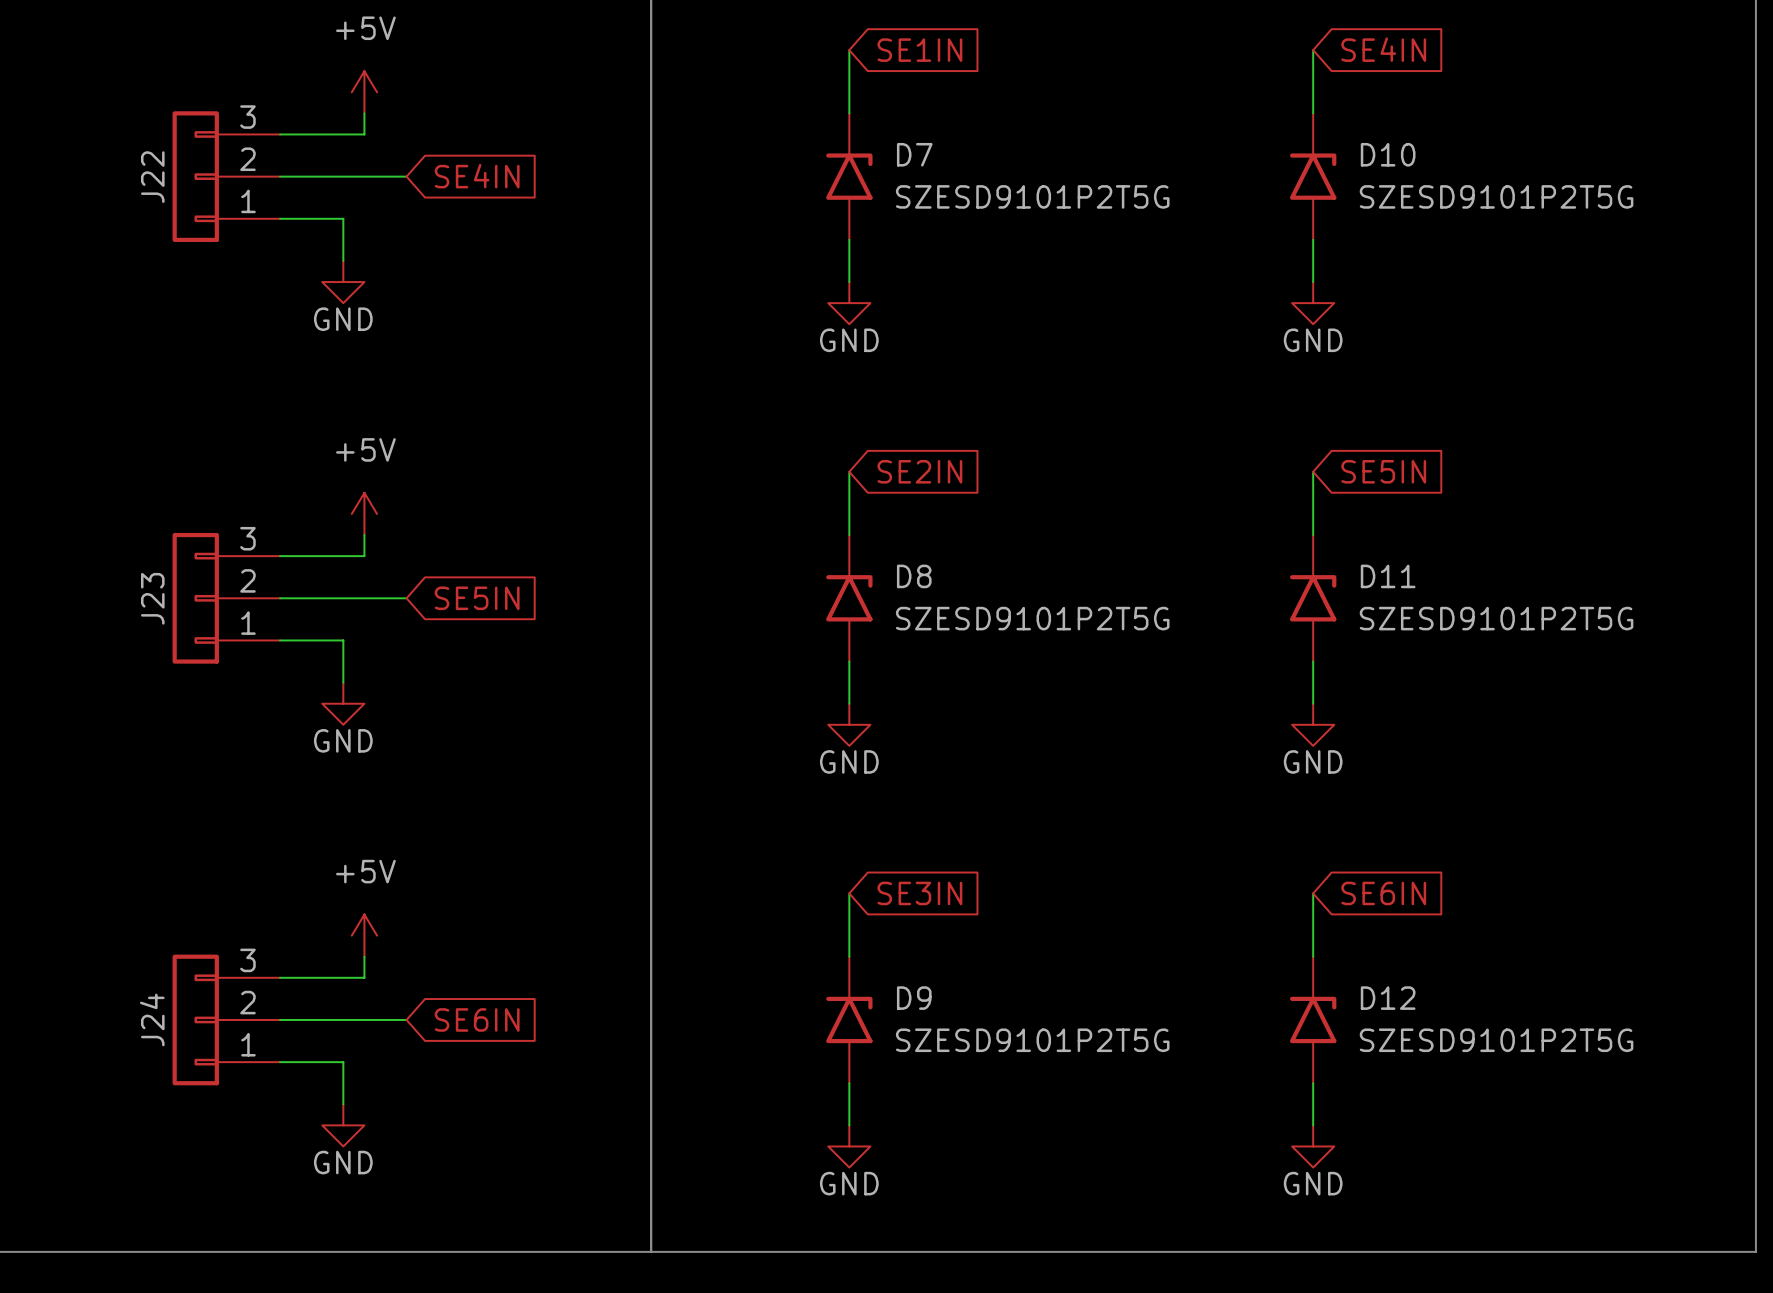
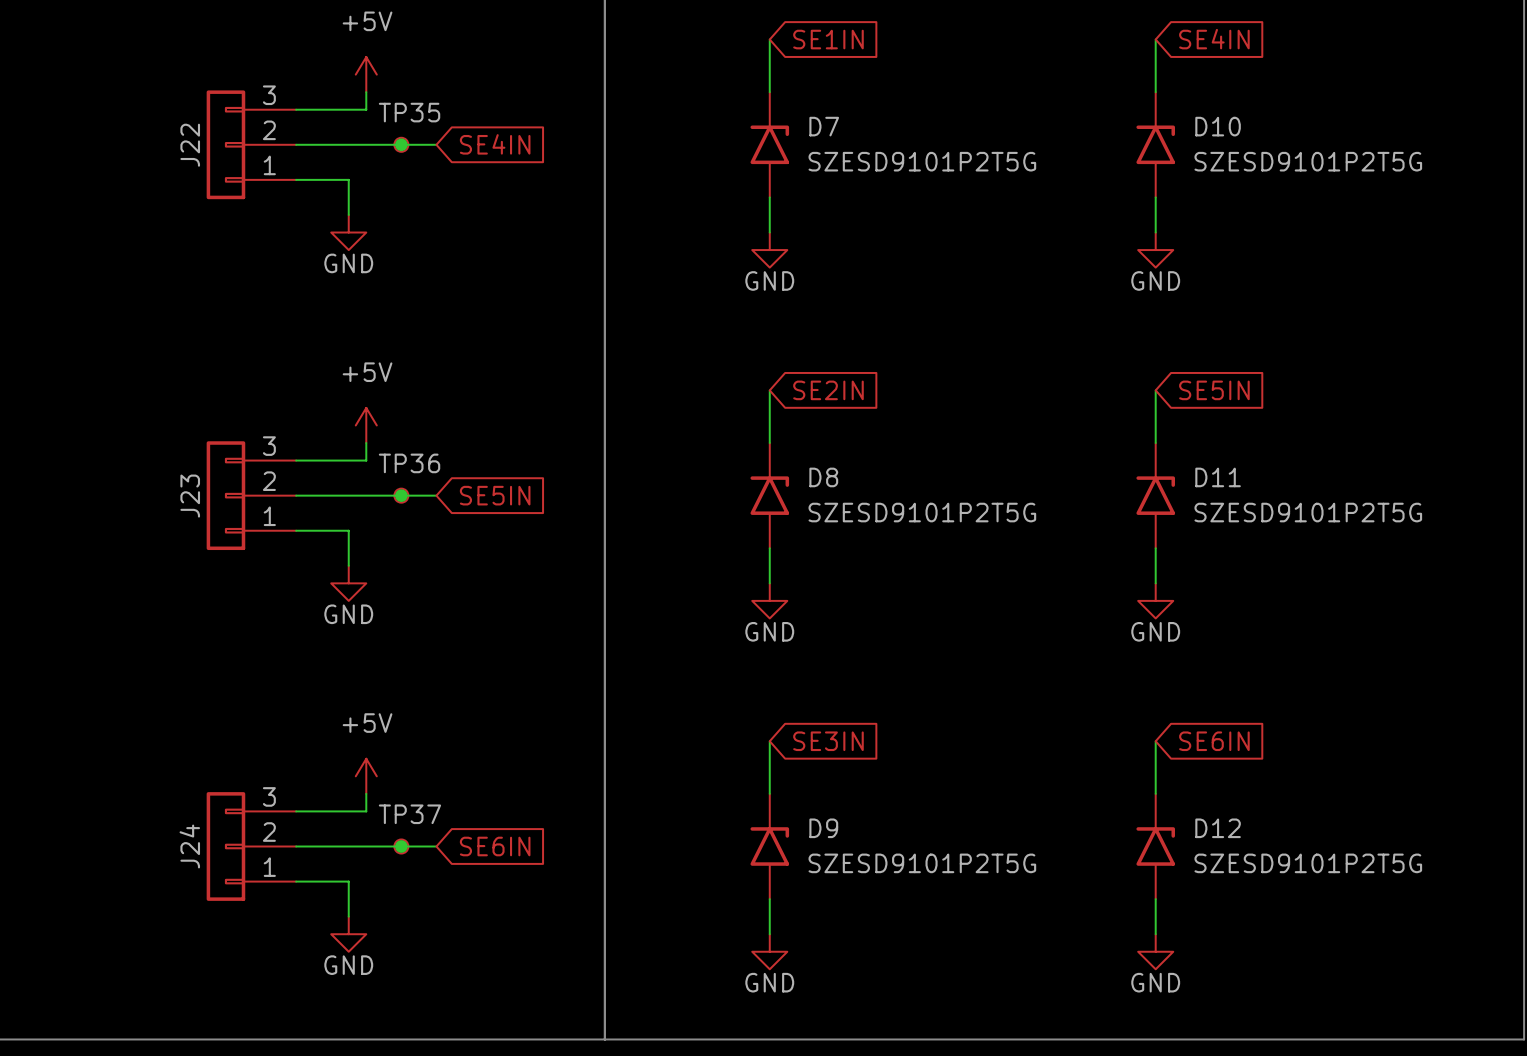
wire: none -> (401, 144) (436, 144)
junction: none -> (401, 144)
TP35: none -> (401, 144)
global label position: SE4IN (477, 176) -> SE4IN (495, 144)
wire: none -> (401, 495) (436, 495)
junction: none -> (401, 495)
TP36: none -> (401, 495)
global label position: SE5IN (477, 598) -> SE5IN (495, 495)
wire: none -> (401, 846) (436, 846)
junction: none -> (401, 846)
TP37: none -> (401, 846)
global label position: SE6IN (477, 1019) -> SE6IN (495, 846)

